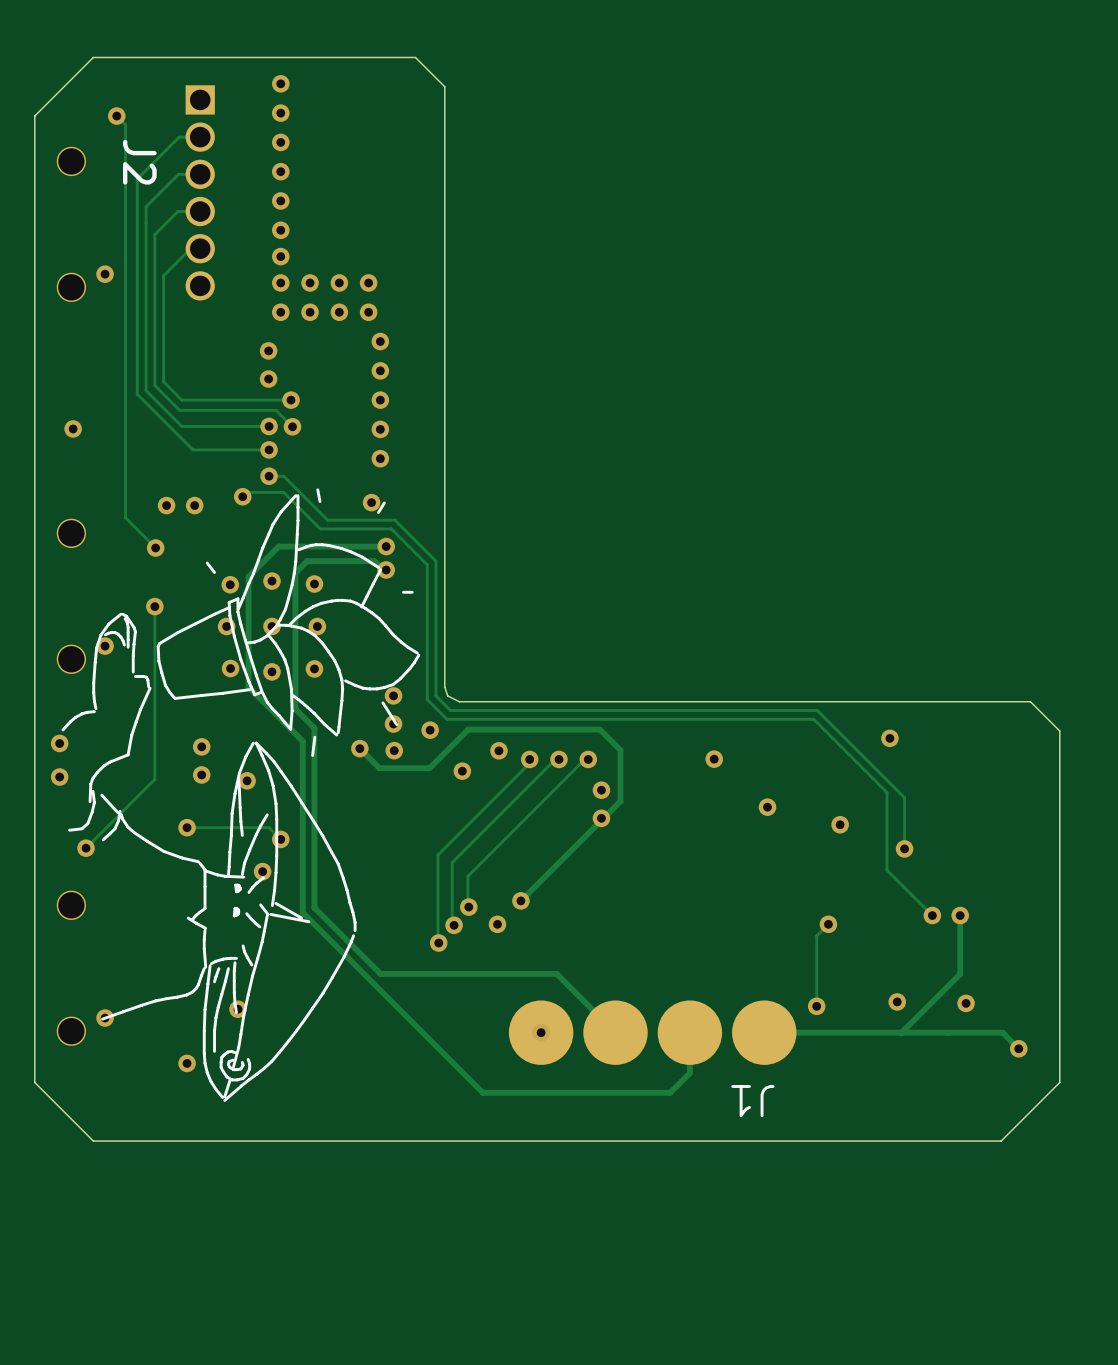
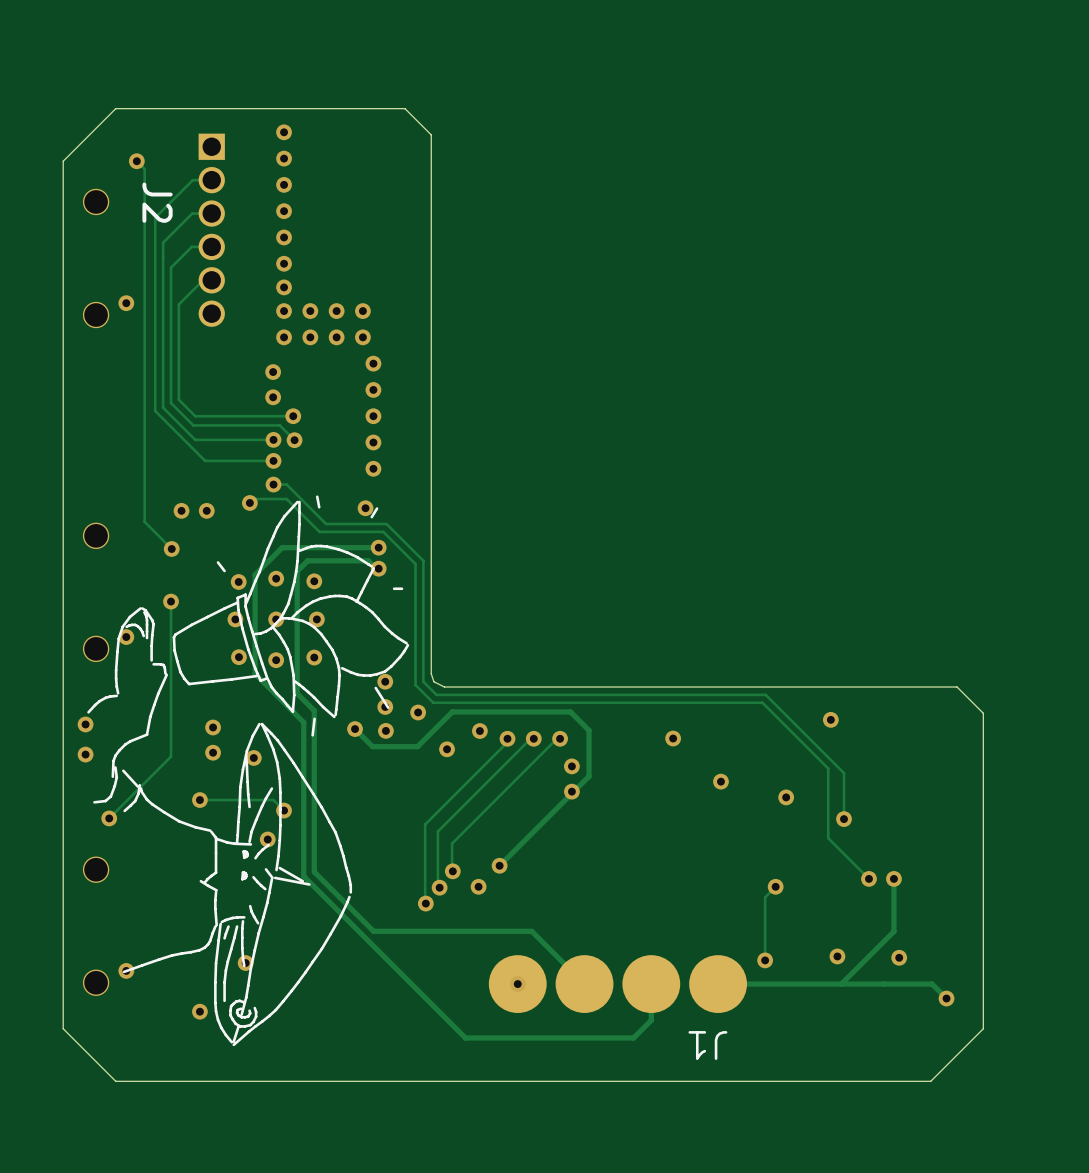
via: (73, 428) -> none

